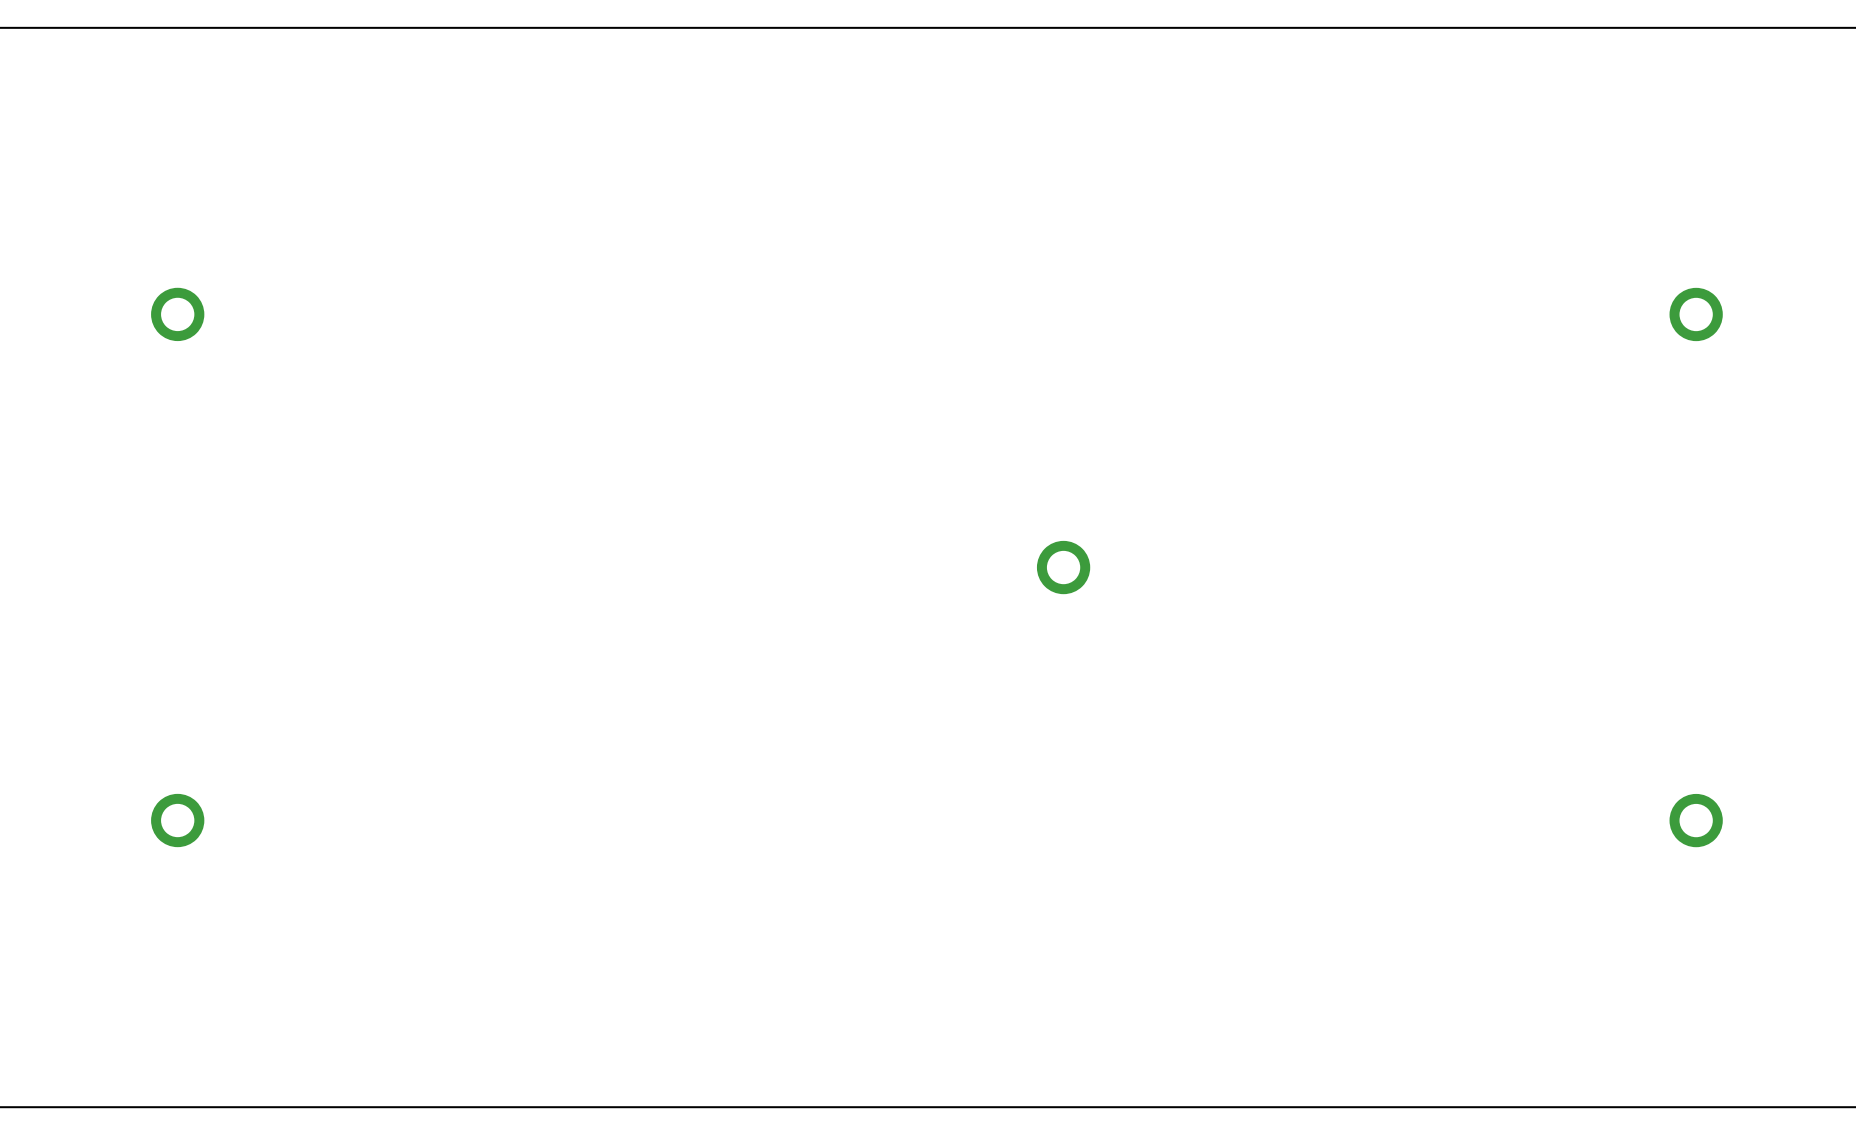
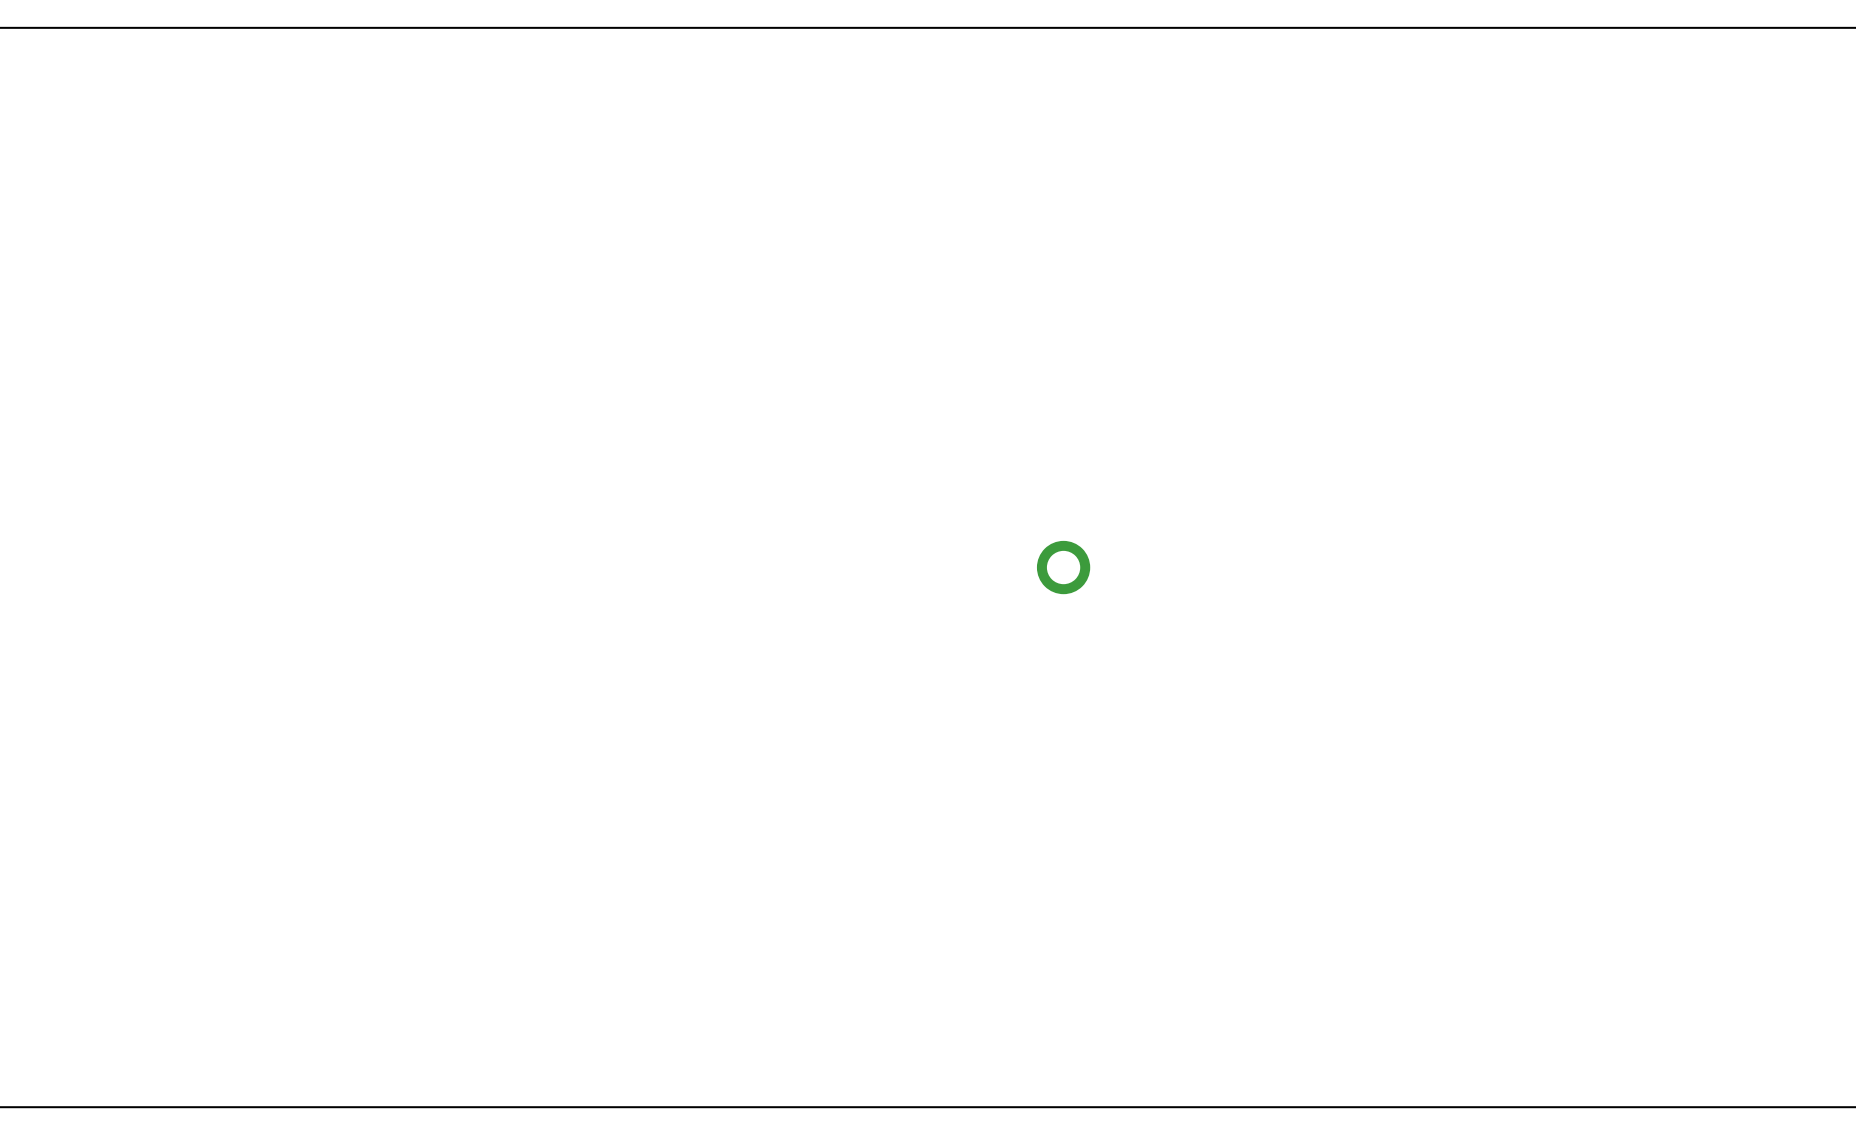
via: (177, 314) -> none
via: (1696, 314) -> none
via: (177, 820) -> none
via: (1696, 820) -> none

